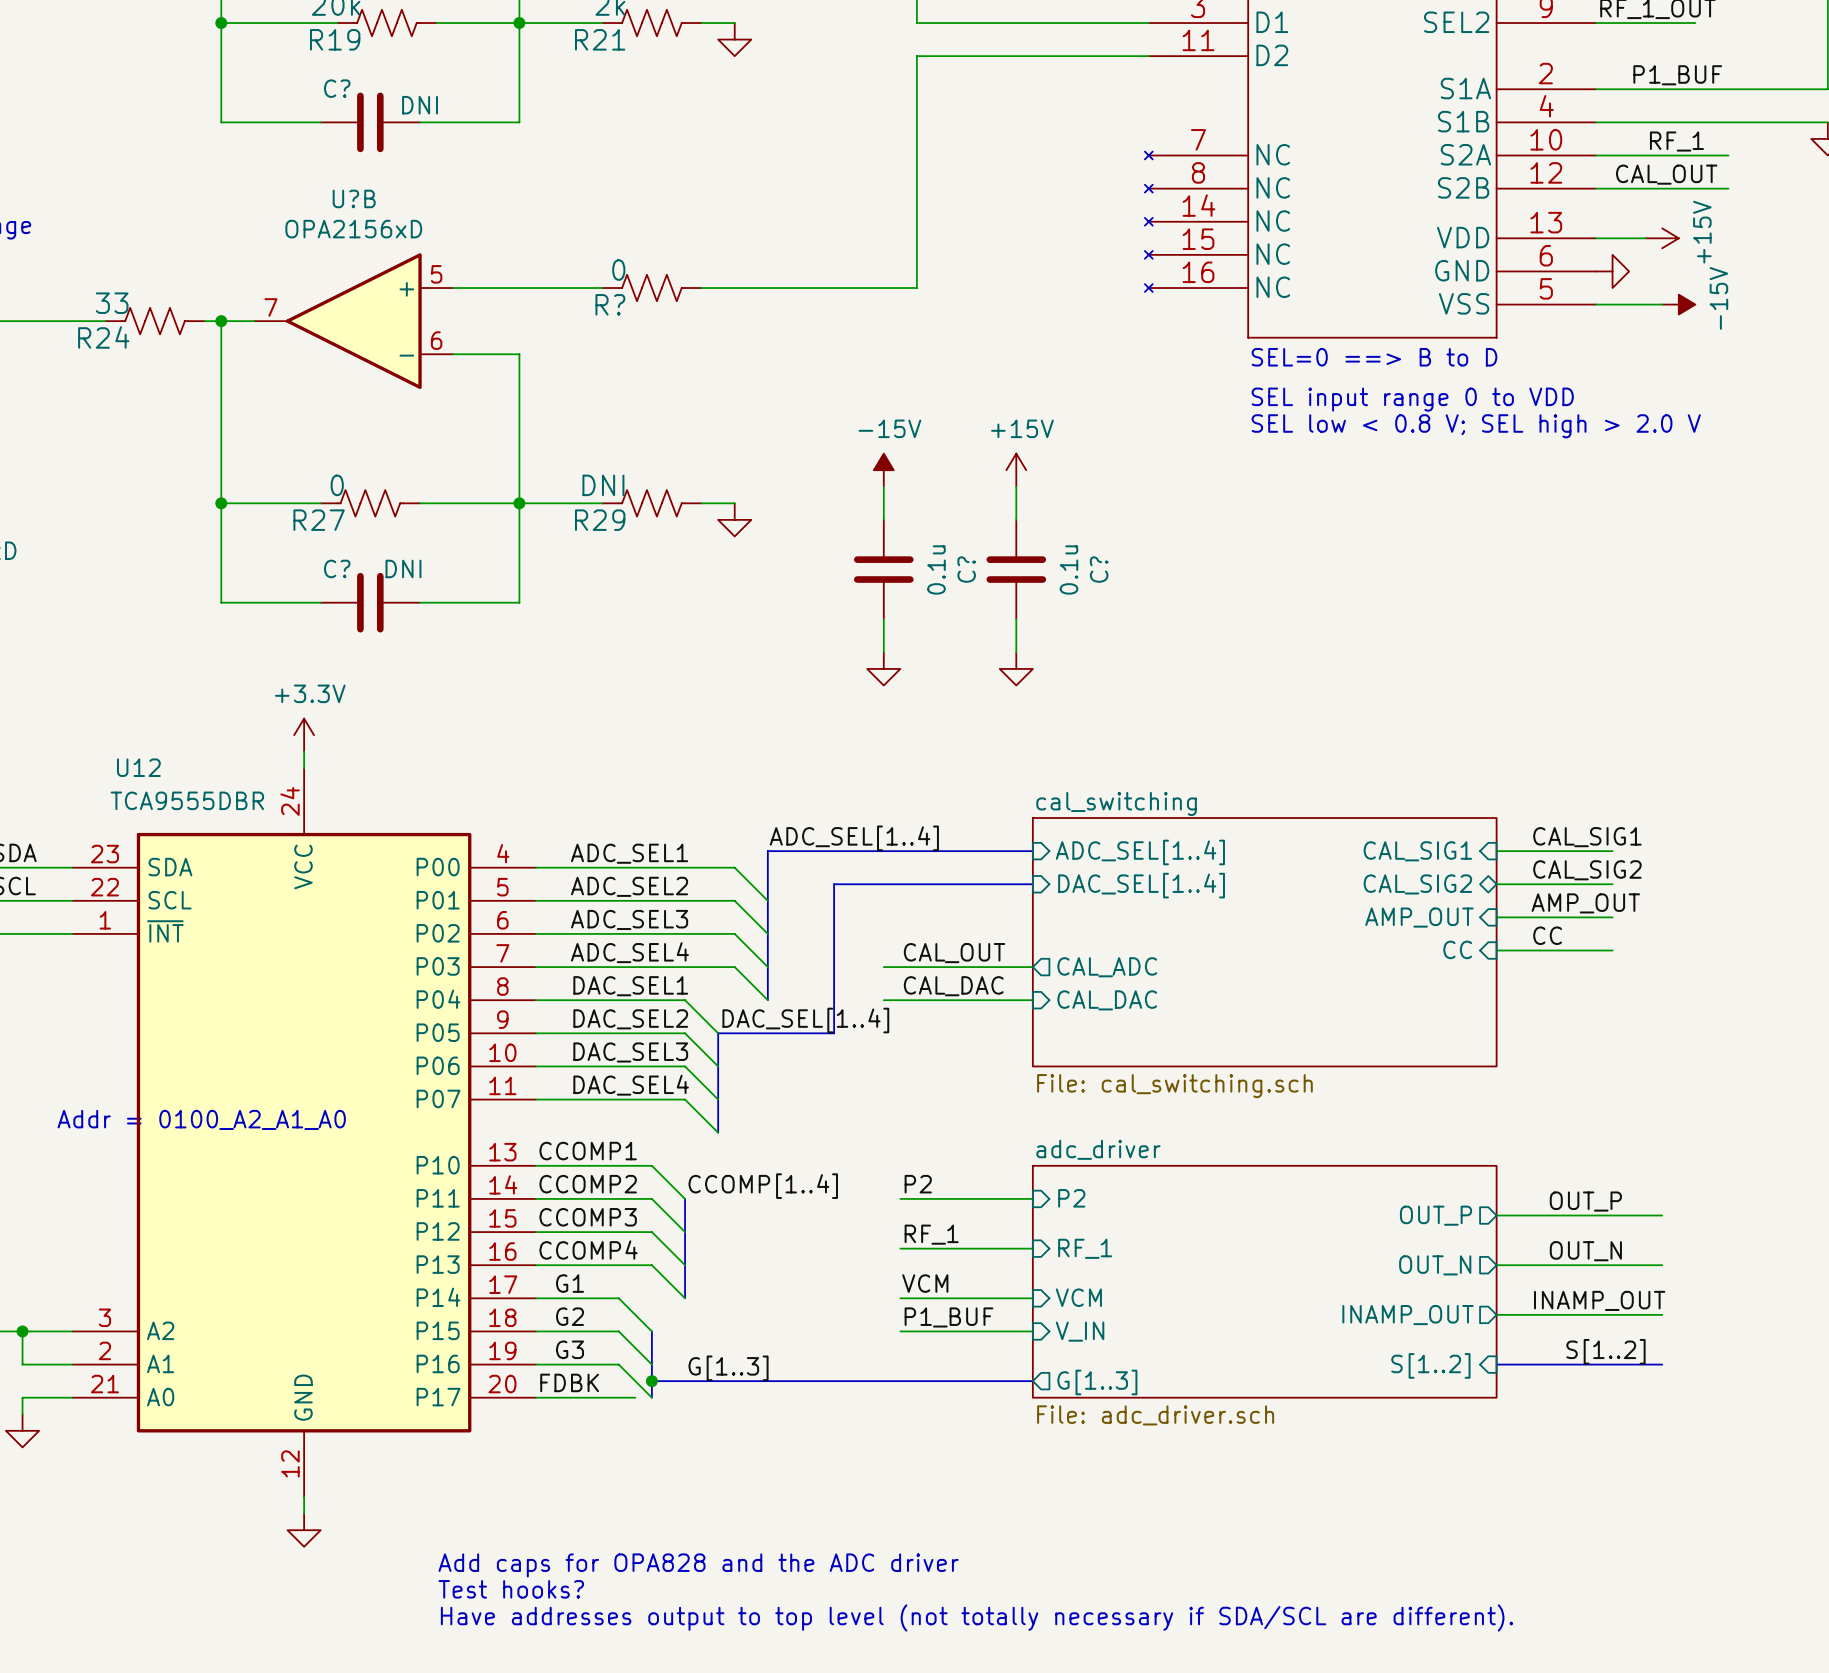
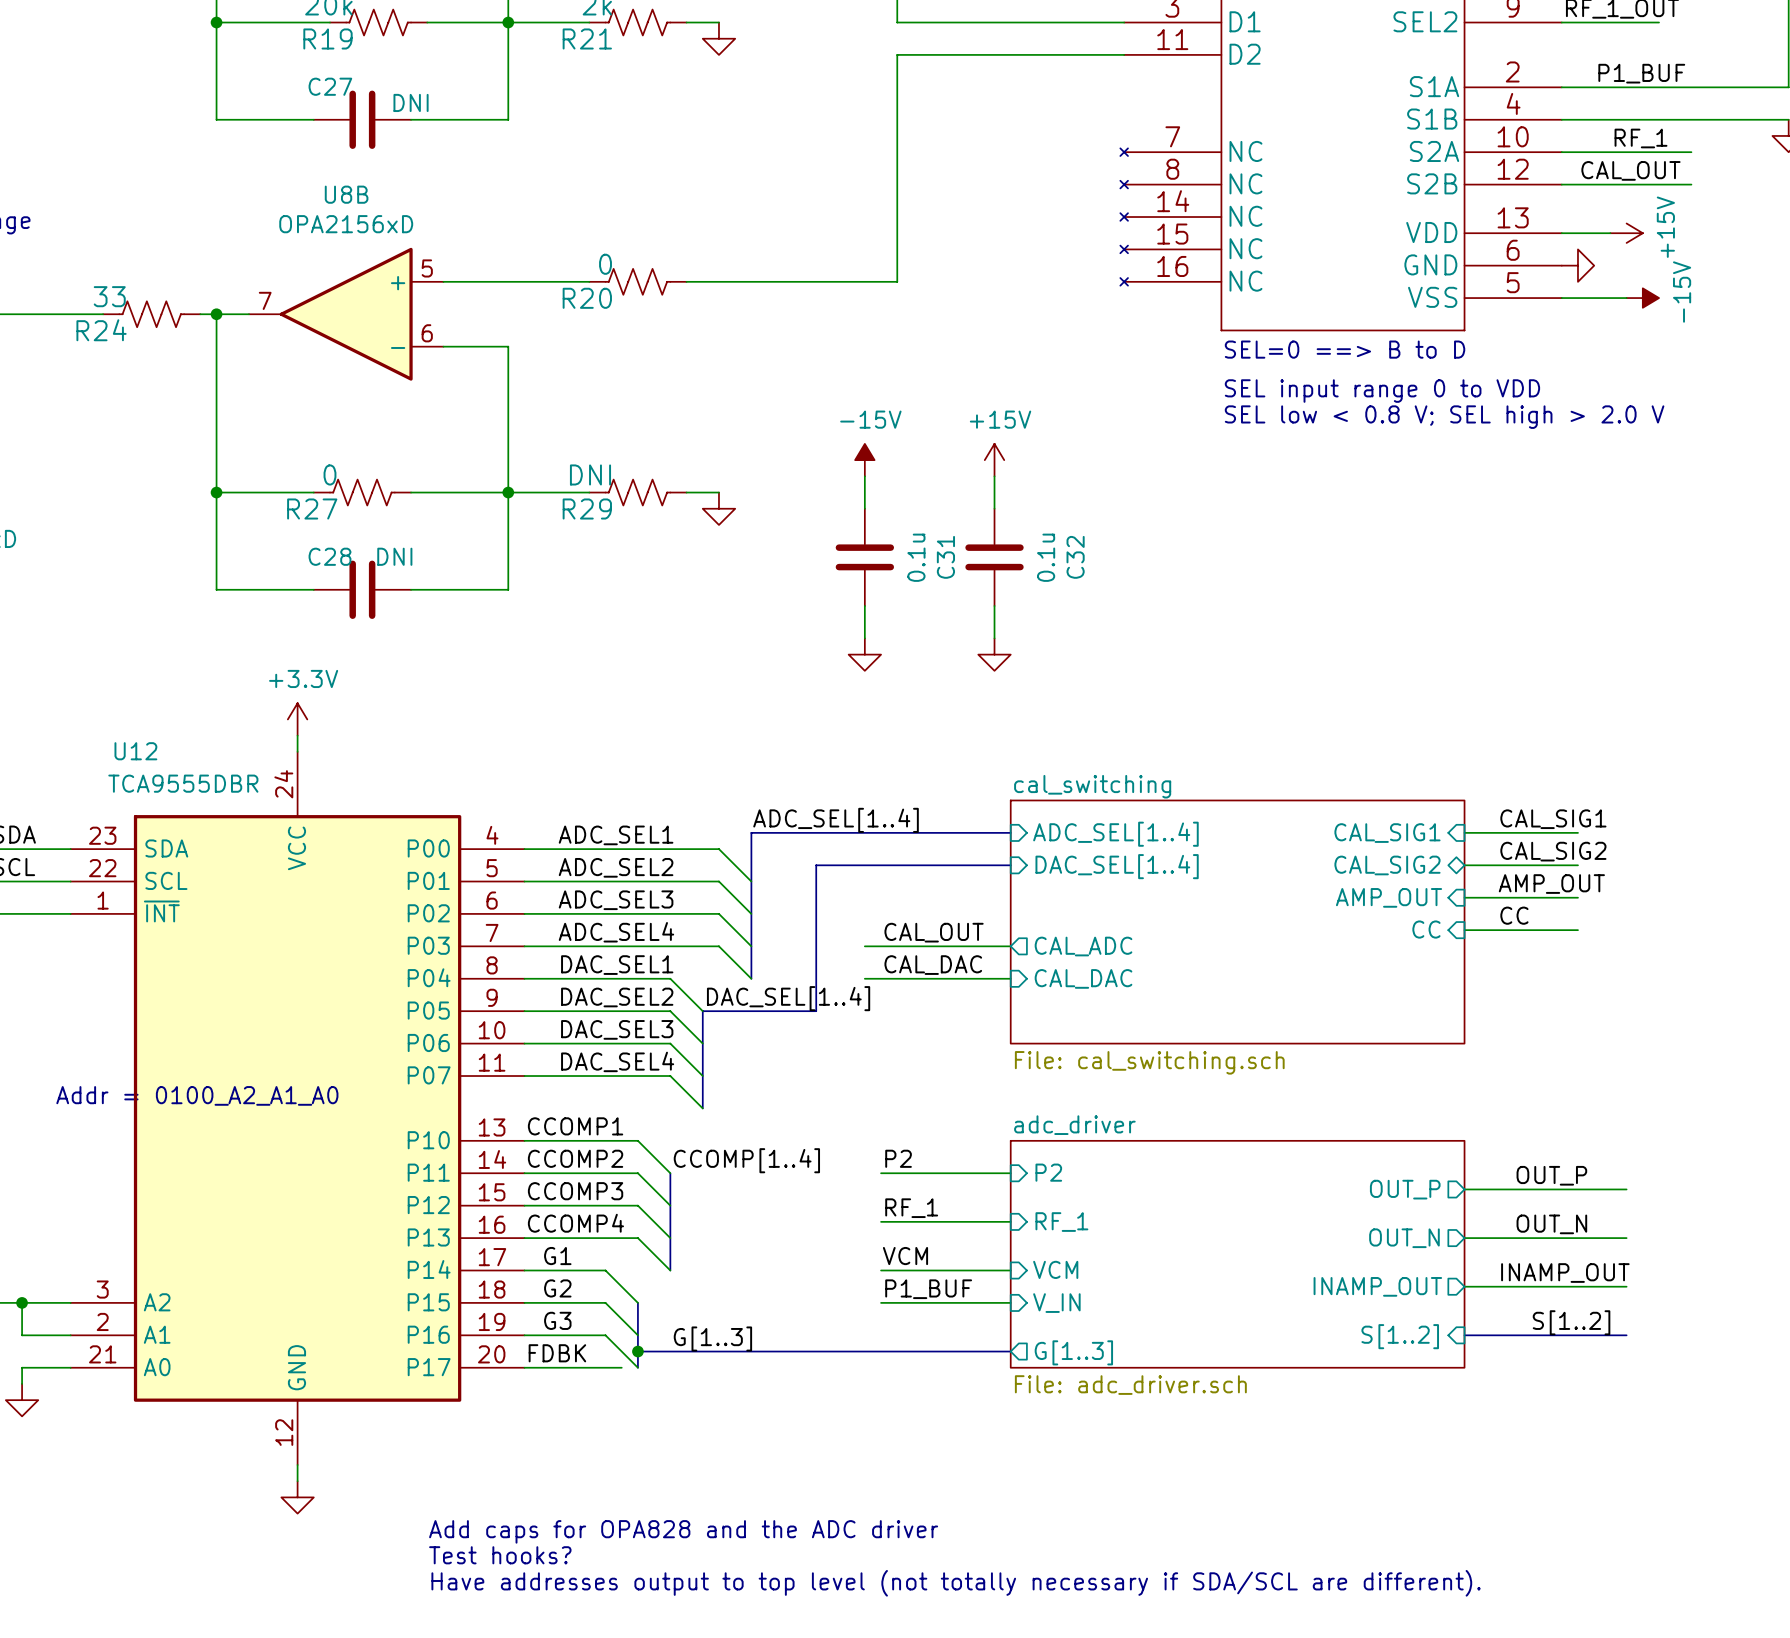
C? name: C? (337, 88) -> C27 (330, 86)
U?B name: U?B (354, 198) -> U8B (346, 194)
R? name: R? (610, 304) -> R20 (587, 298)
C? name: C? (337, 568) -> C28 (330, 556)
C? name: C? (966, 569) -> C31 (945, 557)
C? name: C? (1099, 569) -> C32 (1075, 557)

